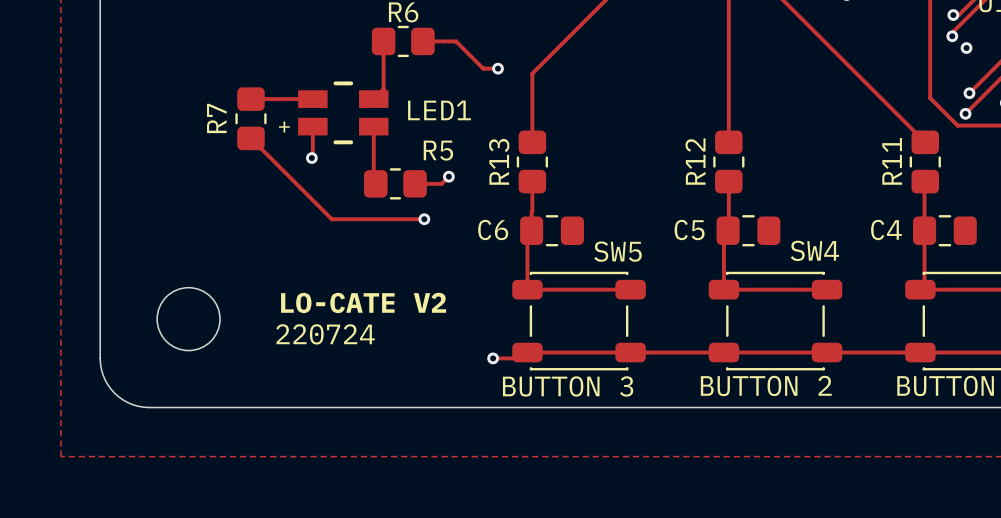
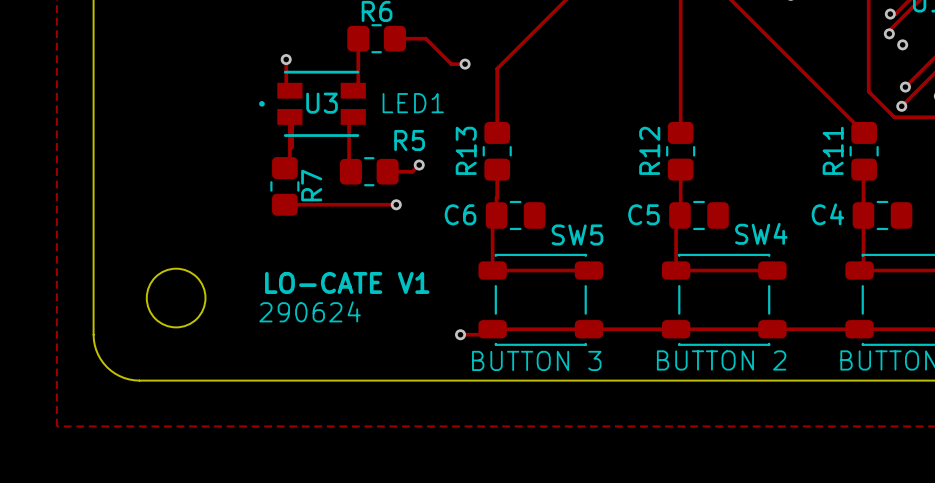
track: none -> (286, 59) (286, 87) (289, 90)
track: (250, 99) (312, 99) -> none
U3: none -> (312, 103)
part: (343, 112) -> none
R7 name position: R7 (216, 118) -> R7 (311, 185)
R7 position: (250, 118) -> (284, 186)
track: none -> (289, 116) (289, 163) (284, 168)
track: (250, 138) (331, 219) -> (284, 204) (309, 204)
via position: (311, 158) -> (286, 59)
text: LO-CATE V2 (363, 302) -> LO-CATE V1 (347, 282)
text: 220724 (325, 334) -> 290624 (310, 311)

